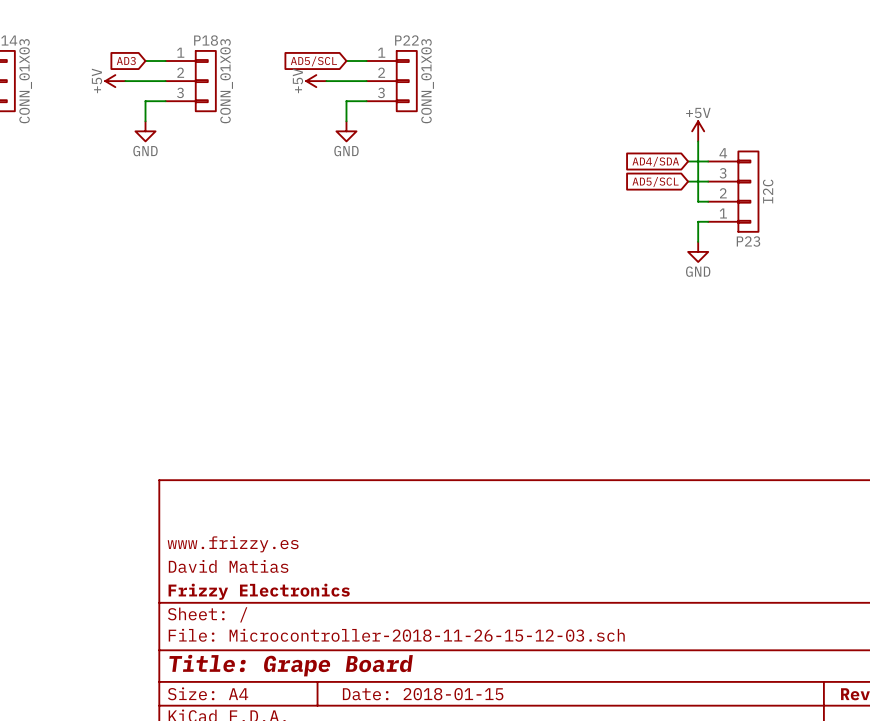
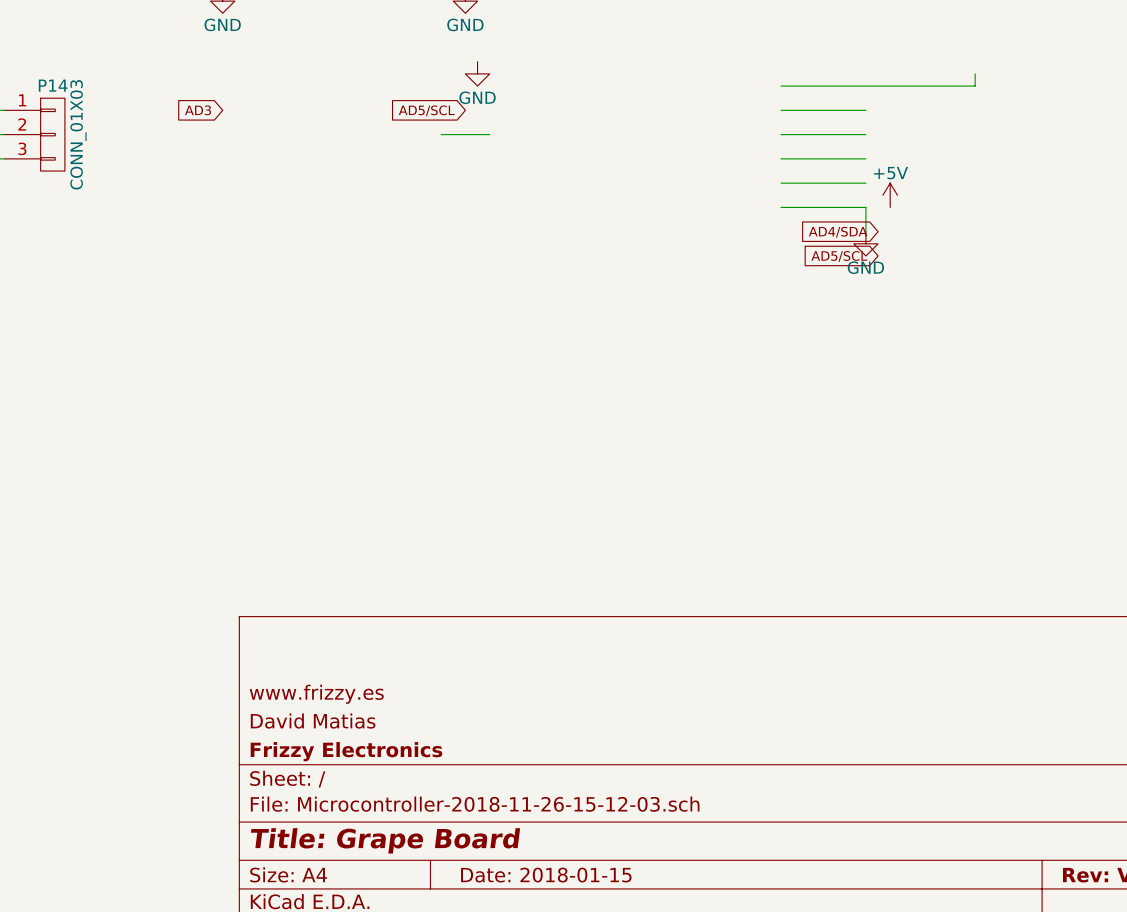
wire: none -> (975, 73) (975, 86) (780, 86)
wire: (145, 61) (165, 61) -> none
wire: (346, 61) (366, 61) -> none
wire: none -> (780, 110) (865, 110)
power symbol: +5V (115, 81) -> none
wire: (125, 81) (165, 81) -> none
P18: CONN_01X03 (190, 81) -> none
power symbol: +5V (316, 81) -> none
P22: CONN_01X03 (391, 81) -> none
wire: none -> (780, 134) (865, 134)
wire: (165, 101) (145, 101) (145, 121) -> none
wire: (366, 101) (346, 101) (346, 121) -> none
wire: none -> (780, 158) (865, 158)
wire: none -> (780, 183) (865, 183)
power symbol: GND (145, 131) -> none
power symbol position: GND (346, 131) -> GND (477, 73)
wire: none -> (780, 207) (865, 207) (865, 231)
wire: (698, 141) (698, 201) (708, 201) -> none
wire: (688, 161) (708, 161) -> none
wire: (688, 181) (708, 181) -> none
P23: I2C (733, 191) -> none
wire: (708, 221) (698, 221) (698, 241) -> none
power symbol position: GND (698, 251) -> GND (865, 243)

